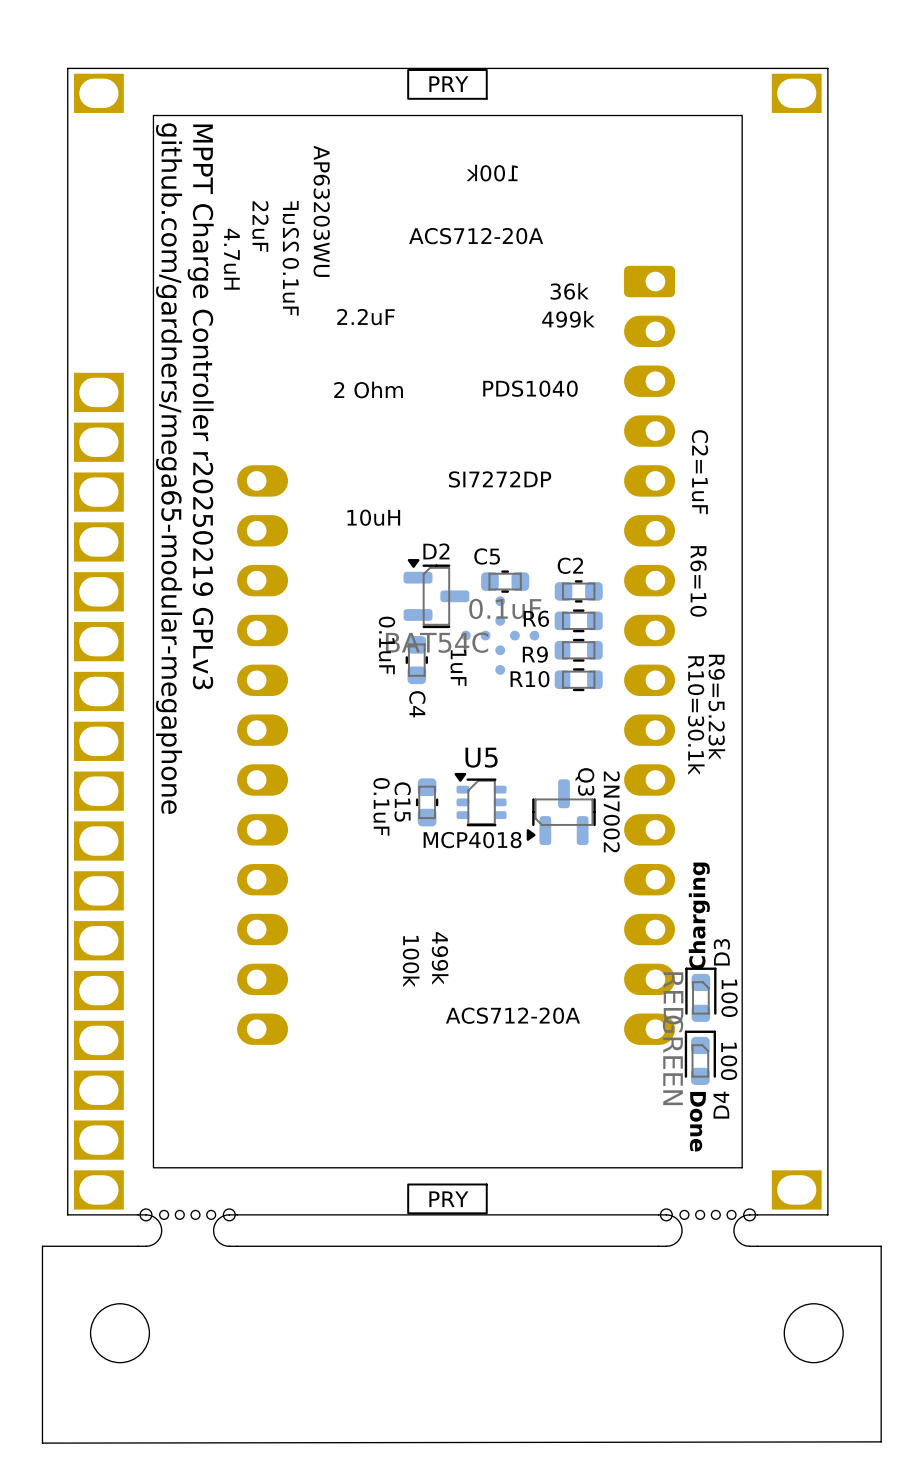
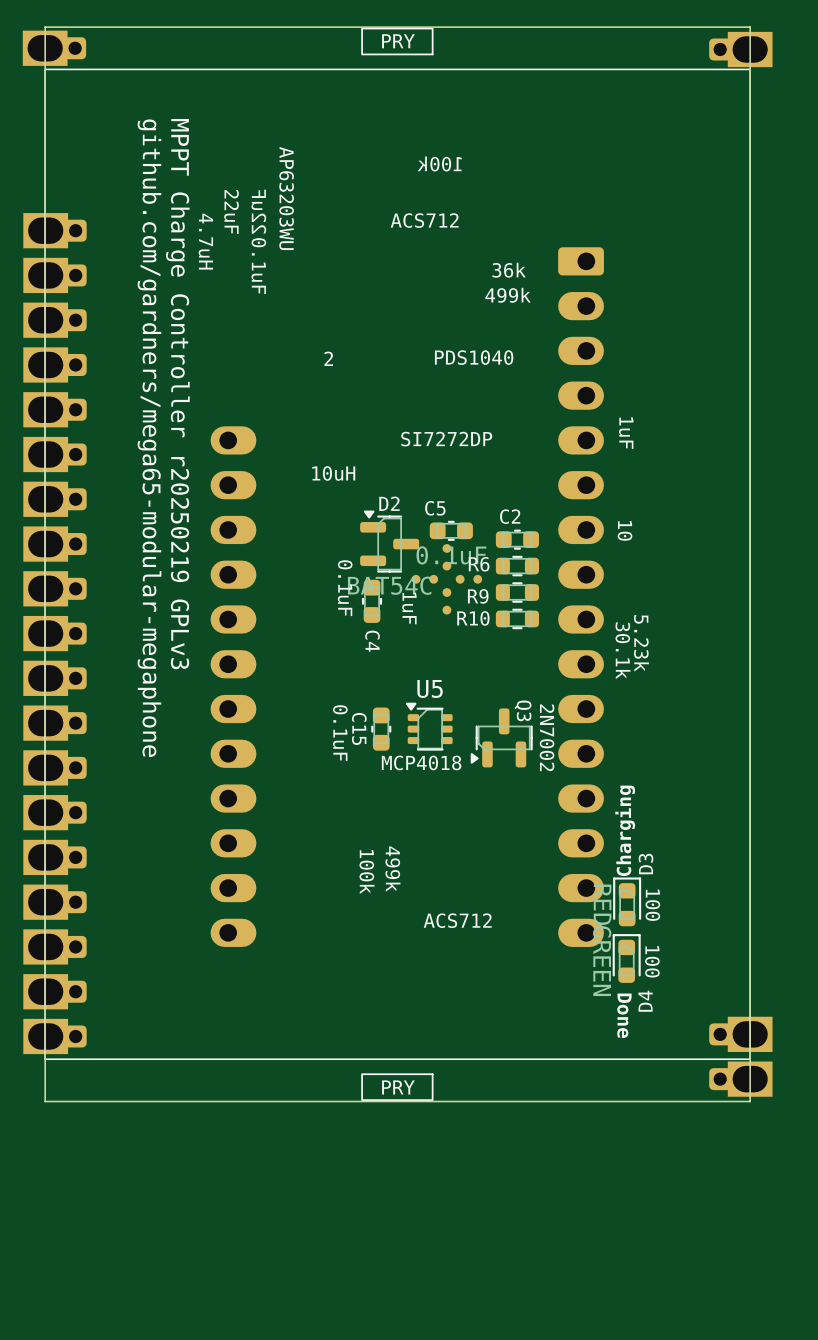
part value: ACS712-20A (476, 236) -> ACS712 (424, 220)
part: 2.2uF (365, 317) -> none
part value: 2 Ohm (368, 389) -> 2 (328, 358)
C2 value: C2=1uF (699, 472) -> 1uF (626, 433)
R6 value: R6=10 (698, 581) -> 10 (625, 530)
part: none -> (397, 564)
part: (447, 657) -> none
R9 value: R9=5.23k (716, 707) -> 5.23k (641, 643)
R10 value: R10=30.1k (696, 715) -> 30.1k (622, 650)
part value: ACS712-20A (512, 1015) -> ACS712 (457, 920)
board edge: (658, 1246) (237, 1246) -> none
board edge: (757, 1246) (881, 1246) (881, 1441) (42, 1443) (42, 1246) (138, 1246) -> none
round board edge: [90, 1303, 150, 1364] -> none
round board edge: [783, 1303, 844, 1364] -> none

